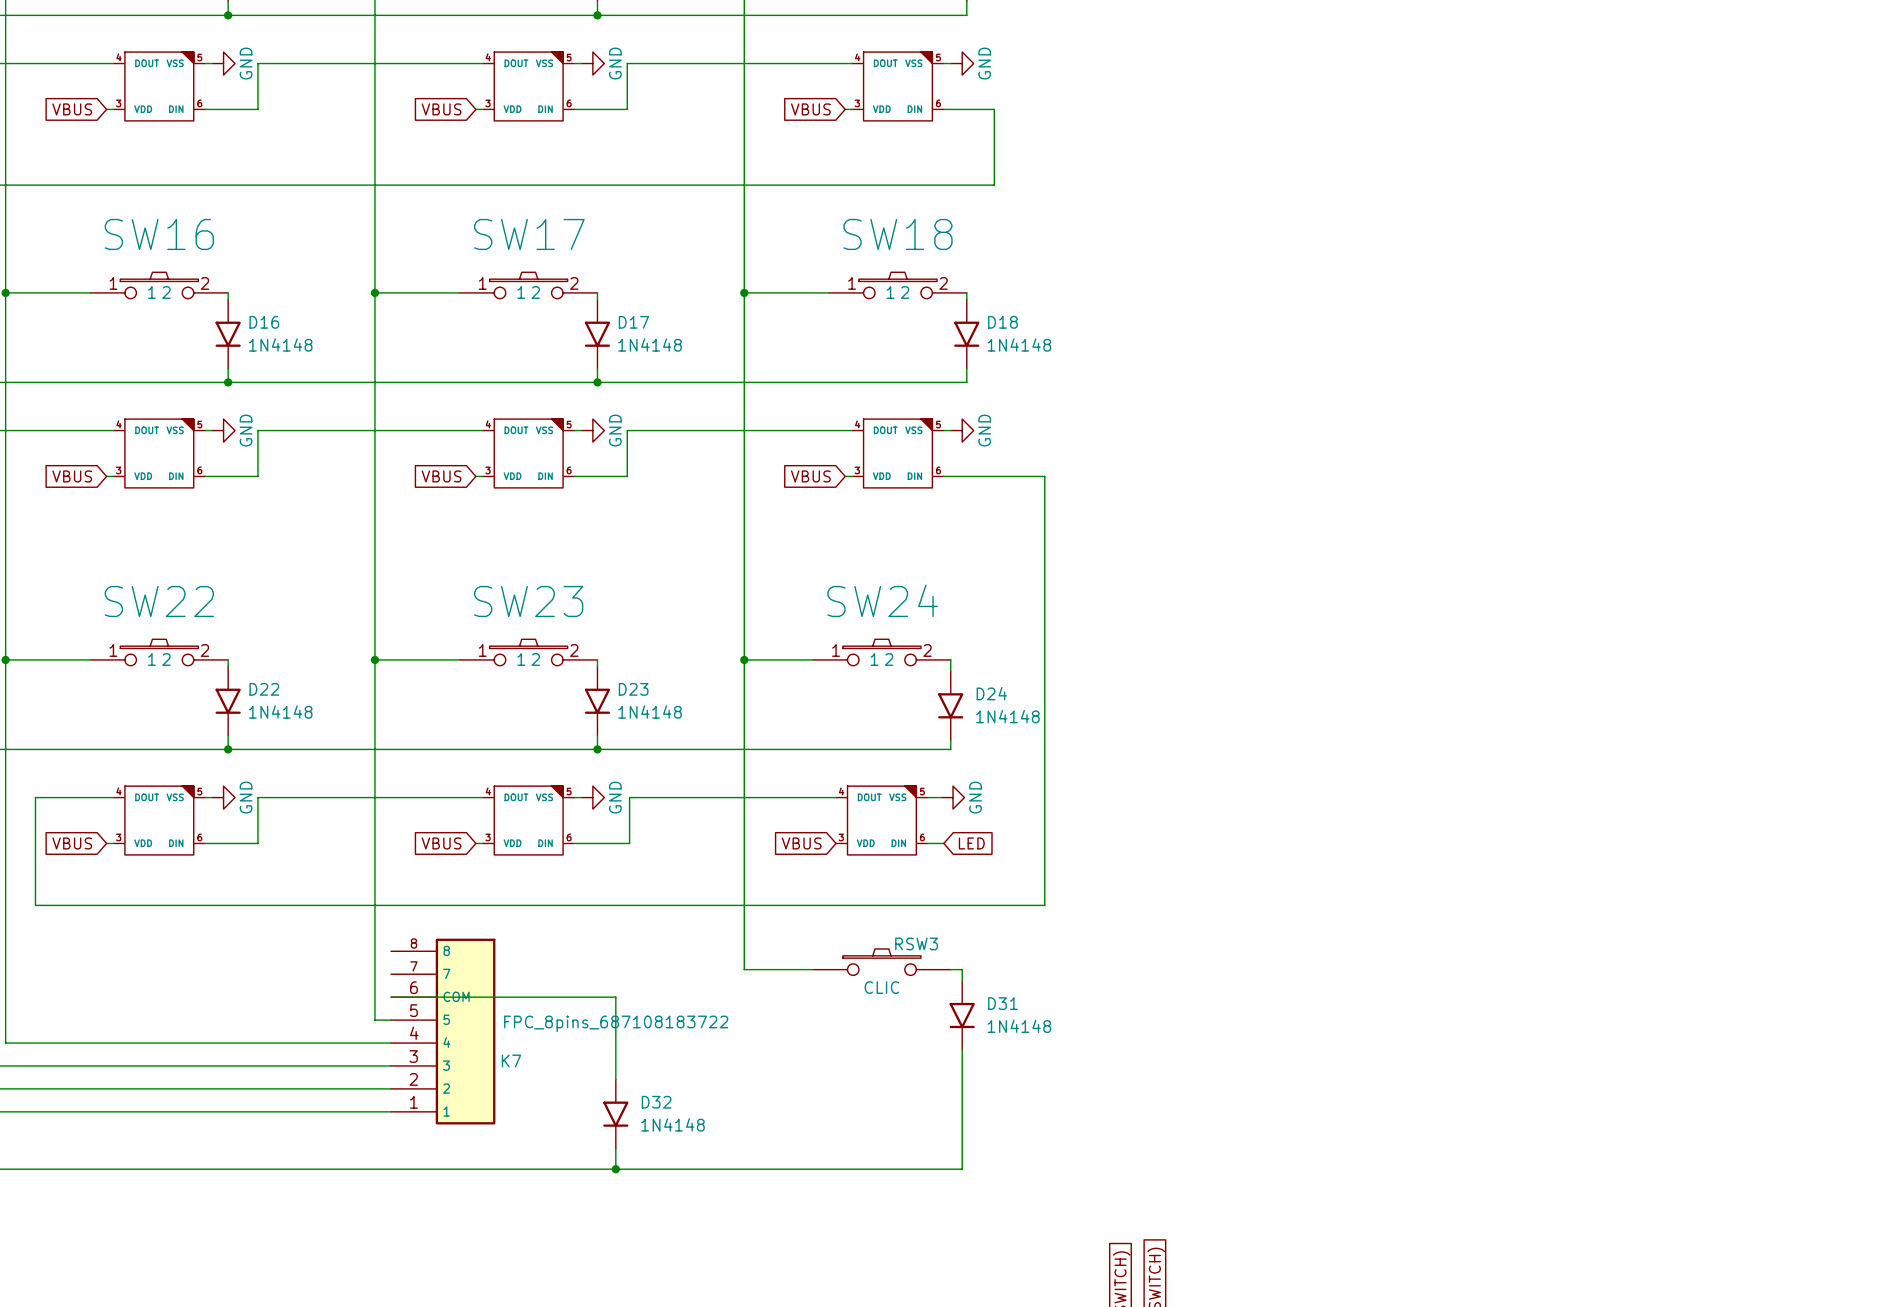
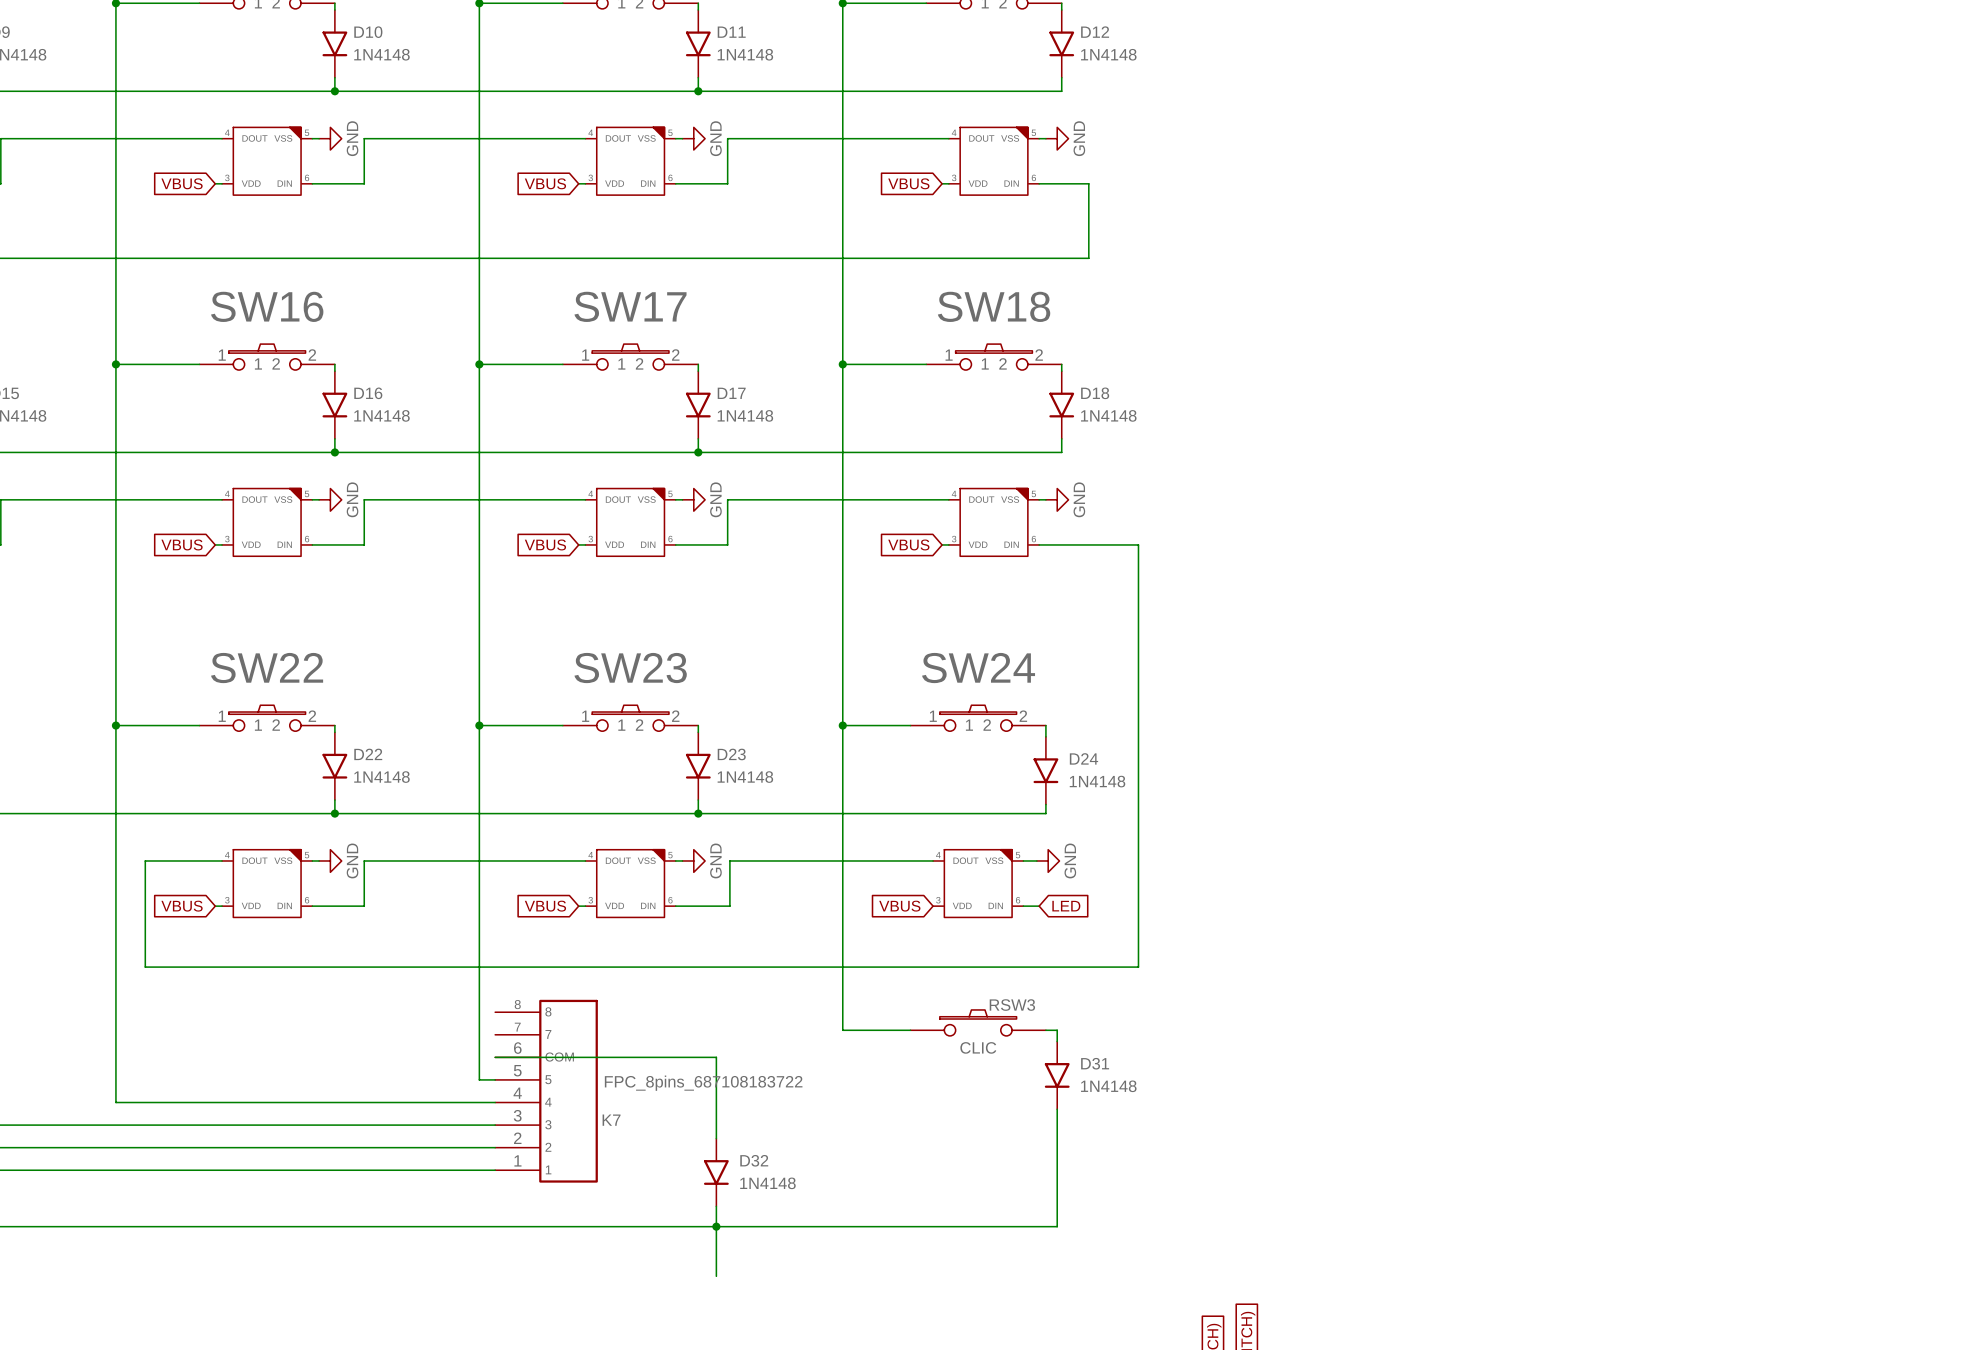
wire: none -> (716, 1226) (716, 1276)

